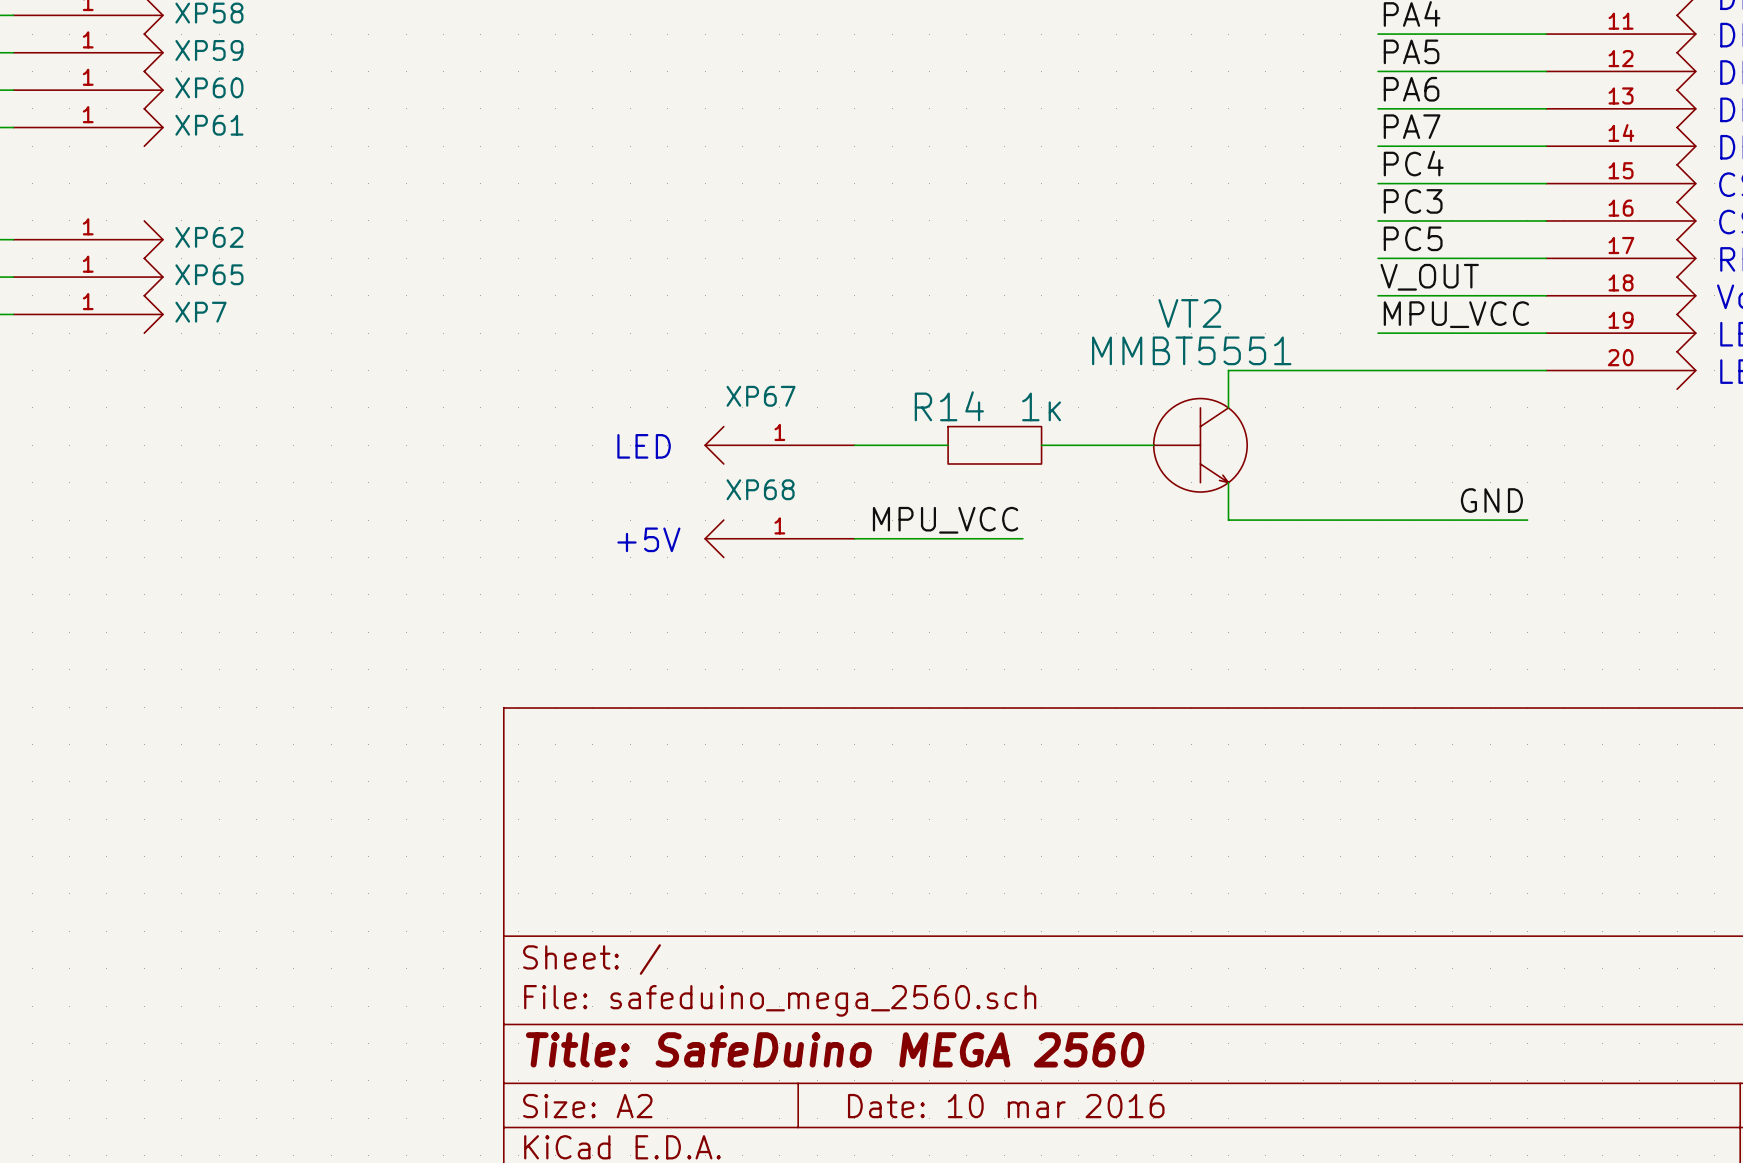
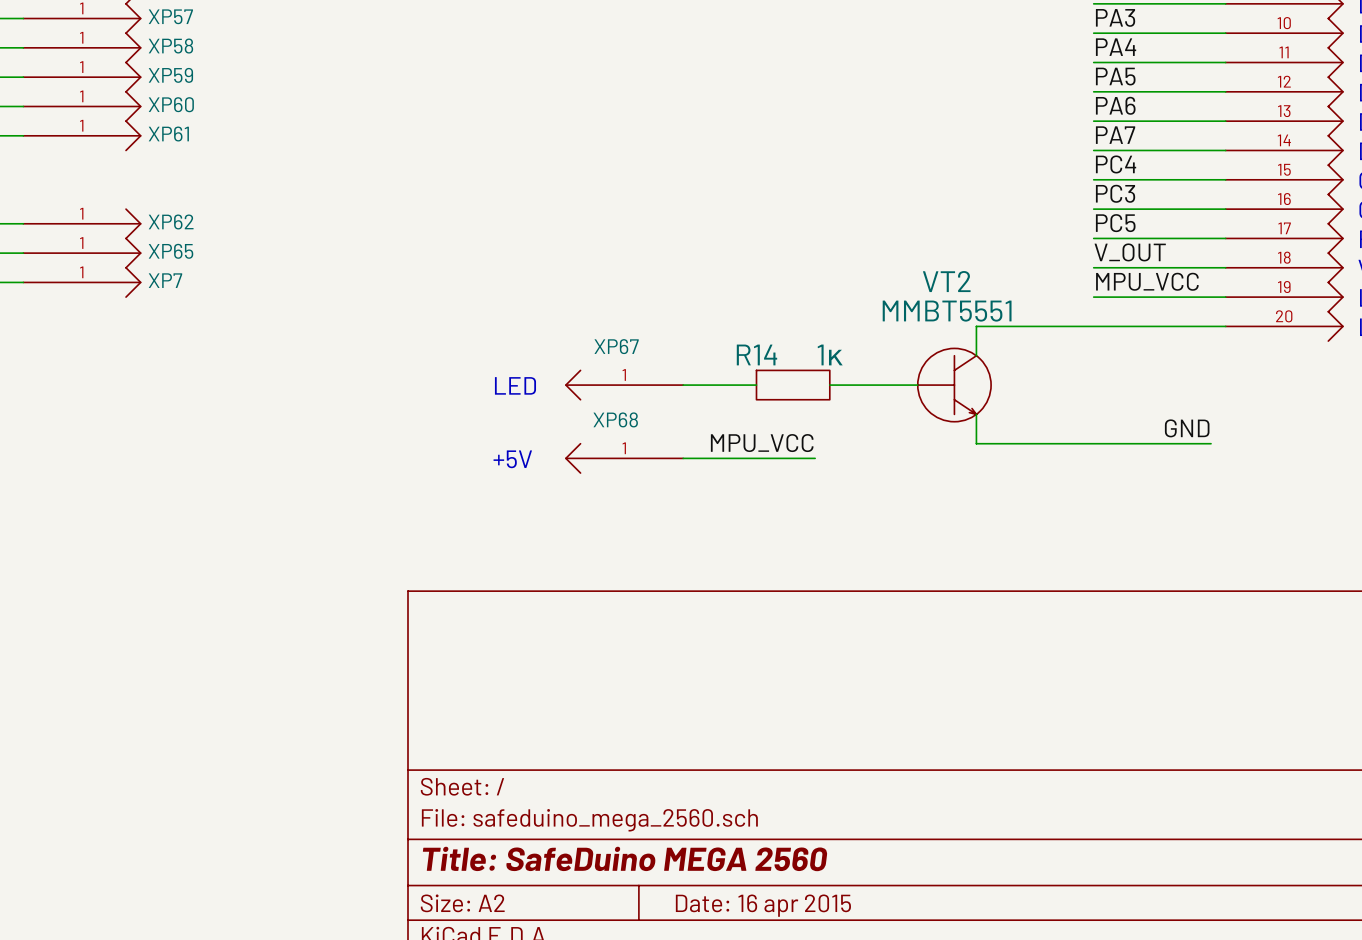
title block: Date: 10 mar 2016 (1006, 1106) -> Date: 16 apr 2015 (763, 905)

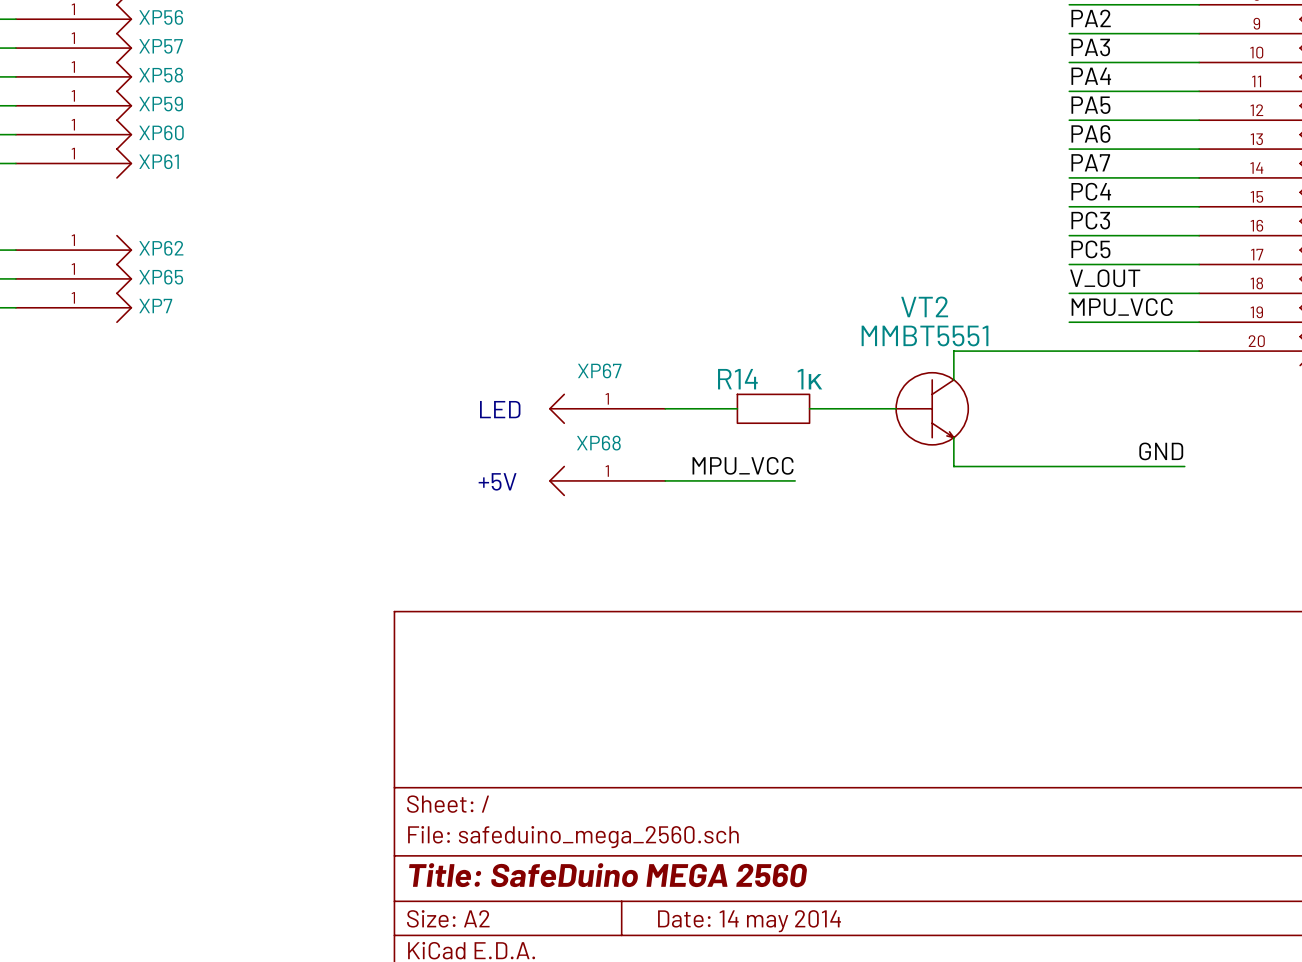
title block: Date: 16 apr 2015 (763, 905) -> Date: 14 may 2014 (749, 921)

